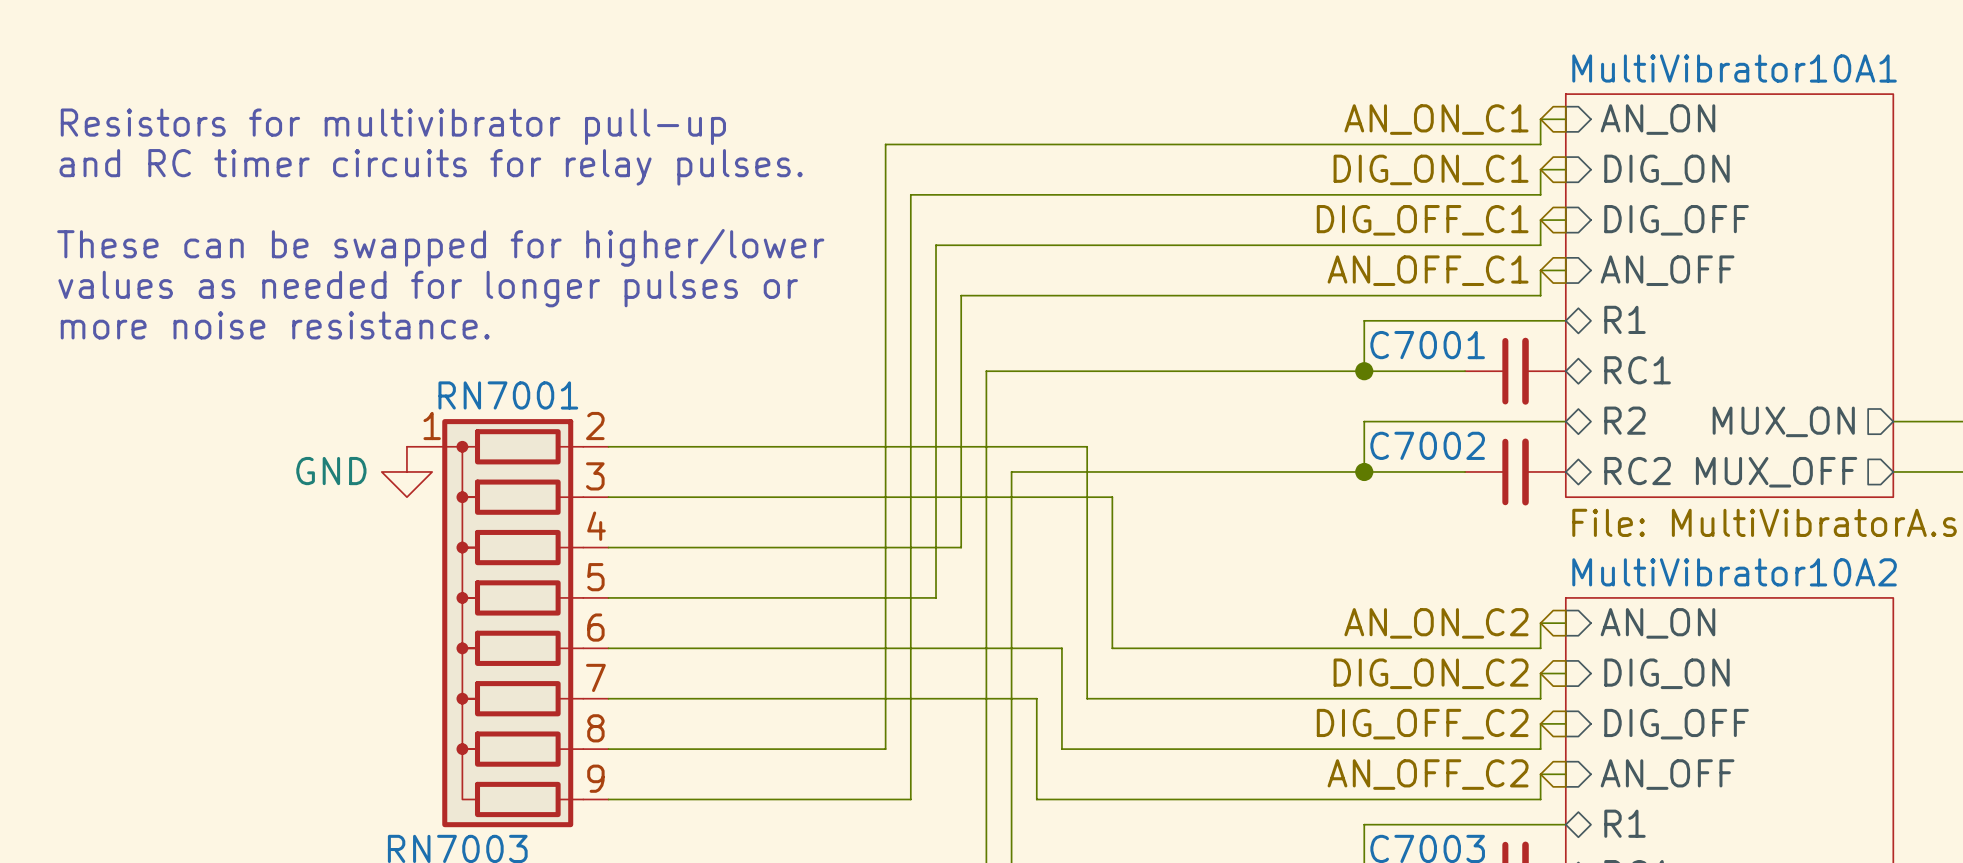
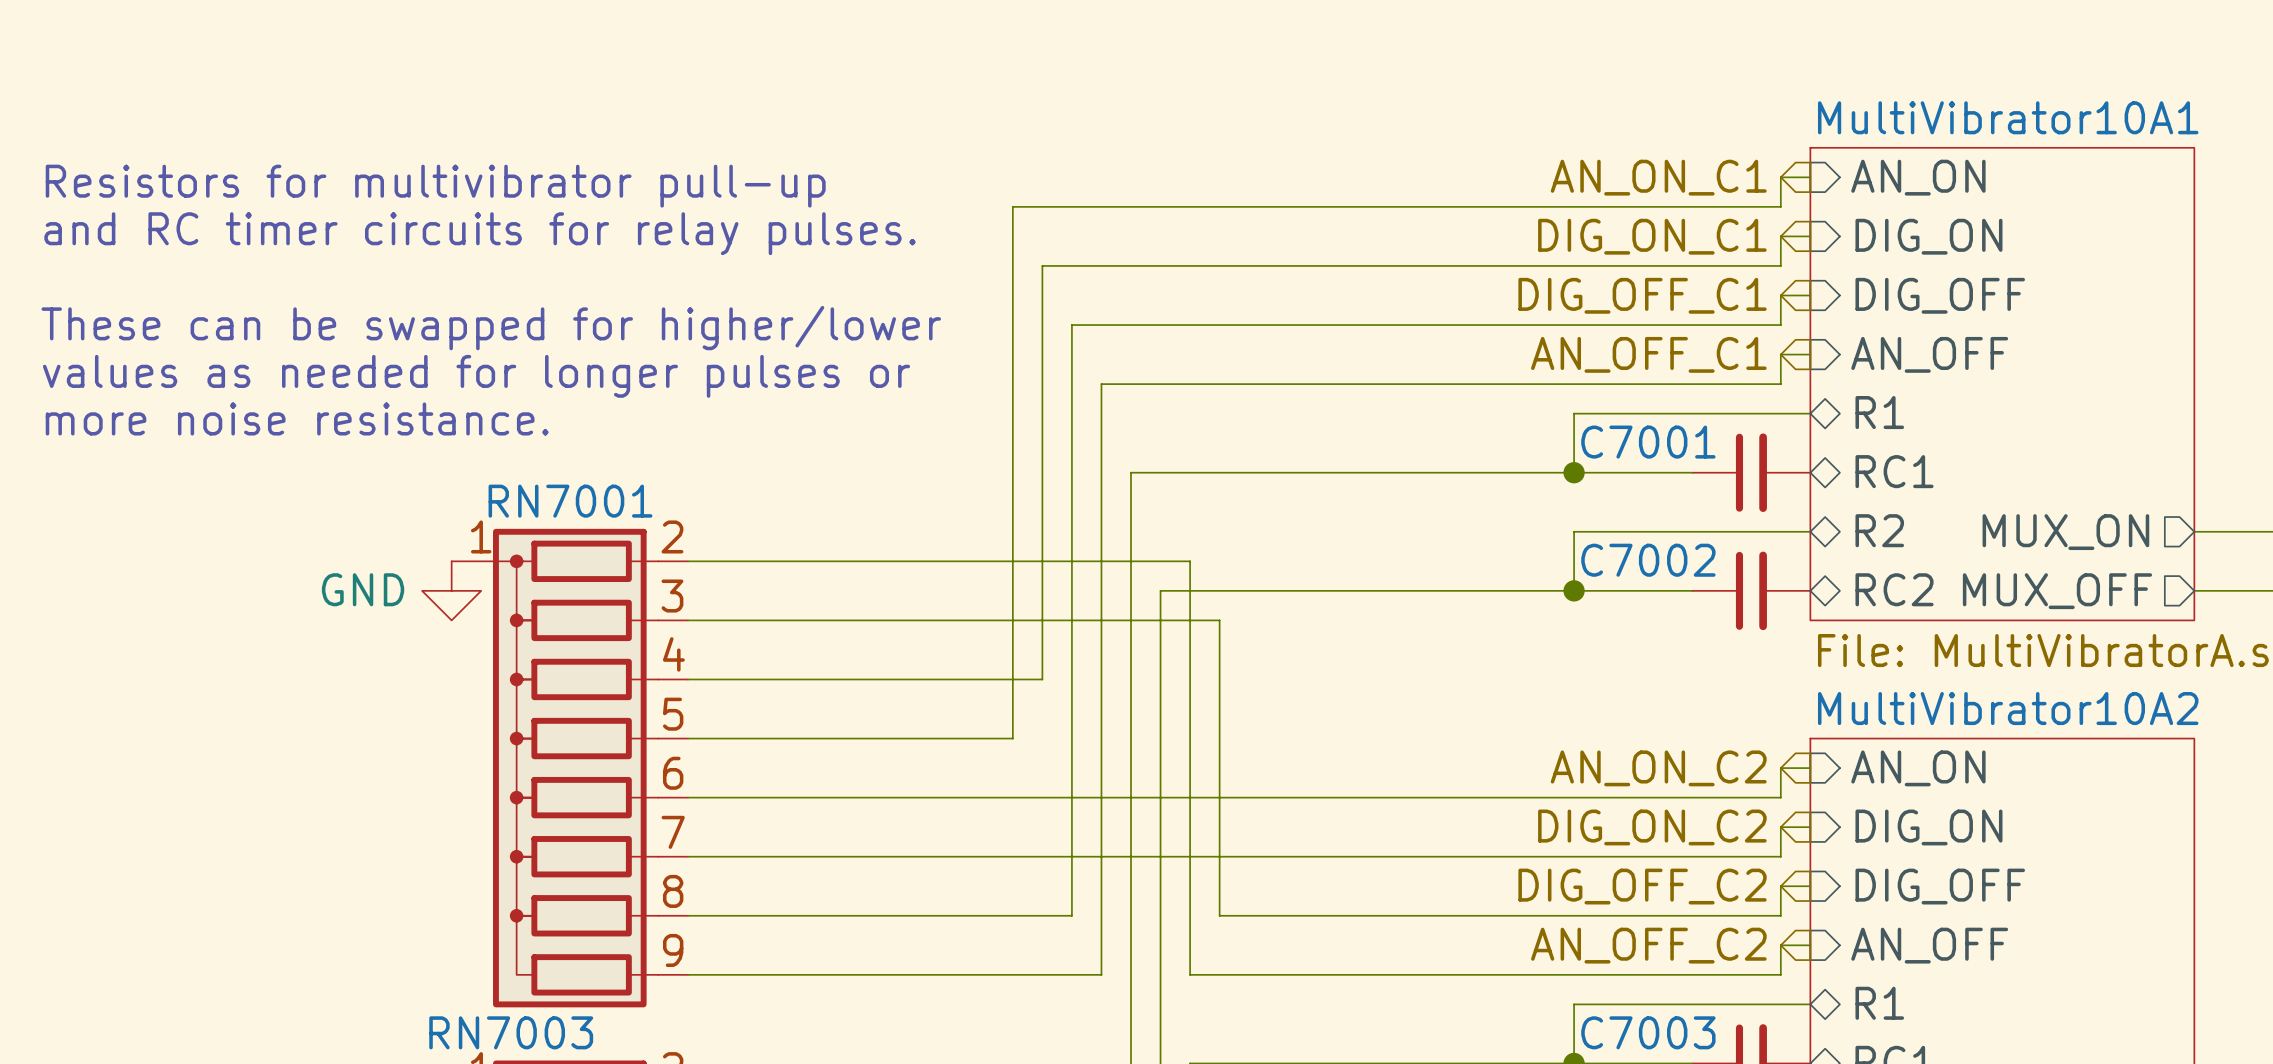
wire: (1036, 446) (1087, 446) (1087, 698) -> (1190, 561) (1190, 856) (1249, 856)
wire: (1061, 497) (1112, 497) (1112, 648) -> (1219, 620) (1219, 797) (1278, 797)
wire: (961, 547) (910, 547) (910, 799) -> (1101, 679) (1101, 974) (1042, 974)
wire: (936, 597) (885, 597) (885, 749) -> (1071, 738) (1071, 915) (1012, 915)

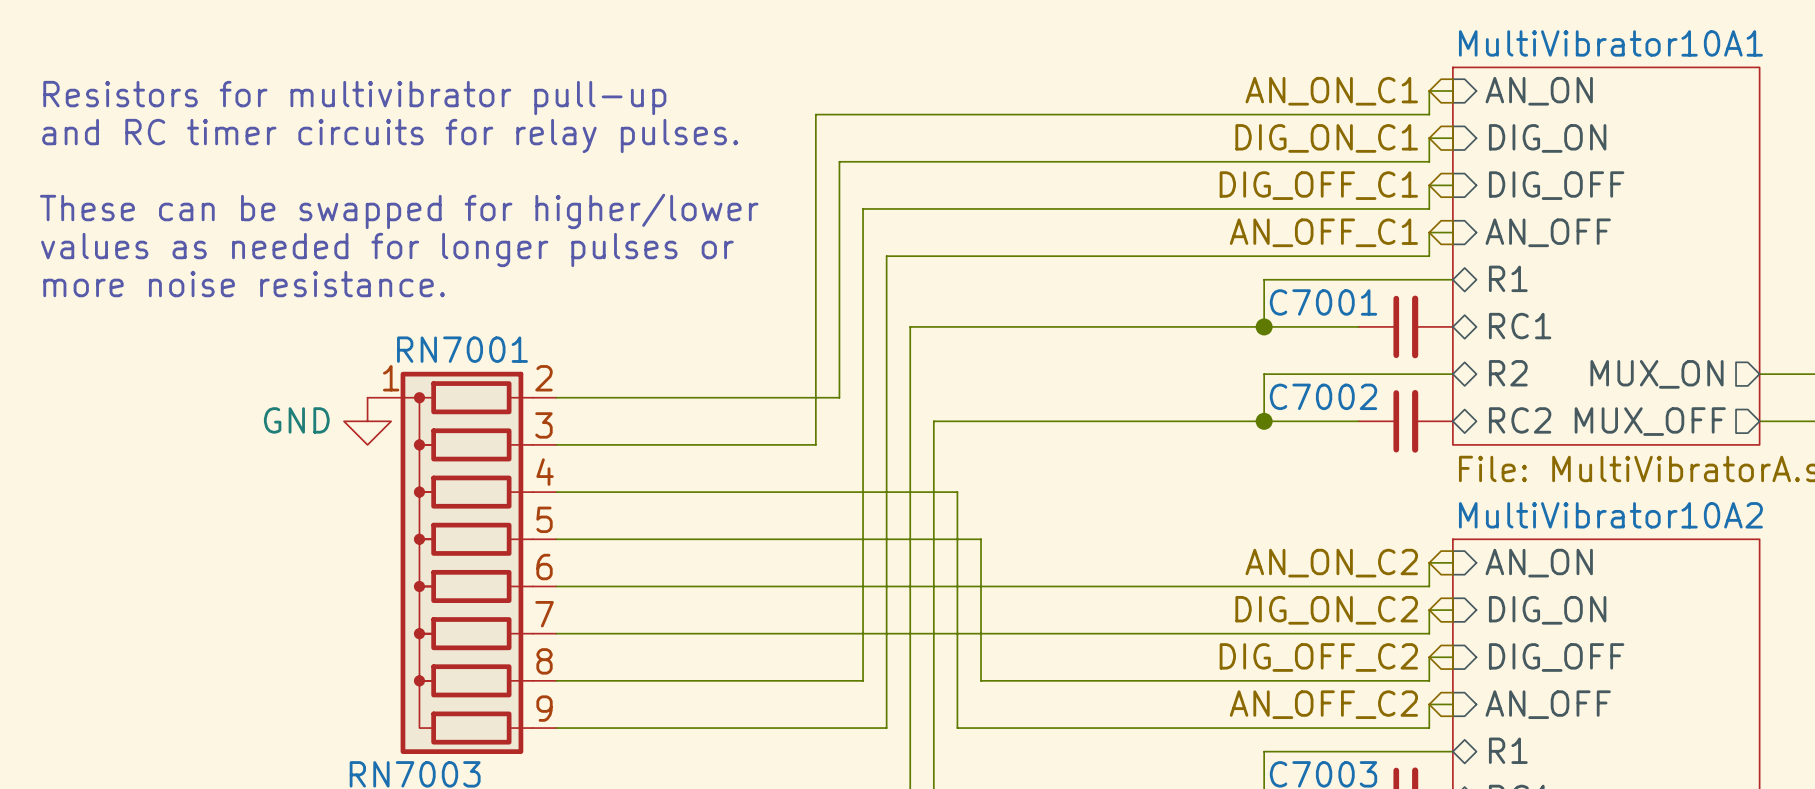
wire: (1042, 679) (1042, 561) (1190, 561) (1190, 679) -> (839, 492) (957, 492)
wire: (1012, 738) (1012, 620) (1219, 620) (1219, 738) -> (815, 539) (981, 539)

